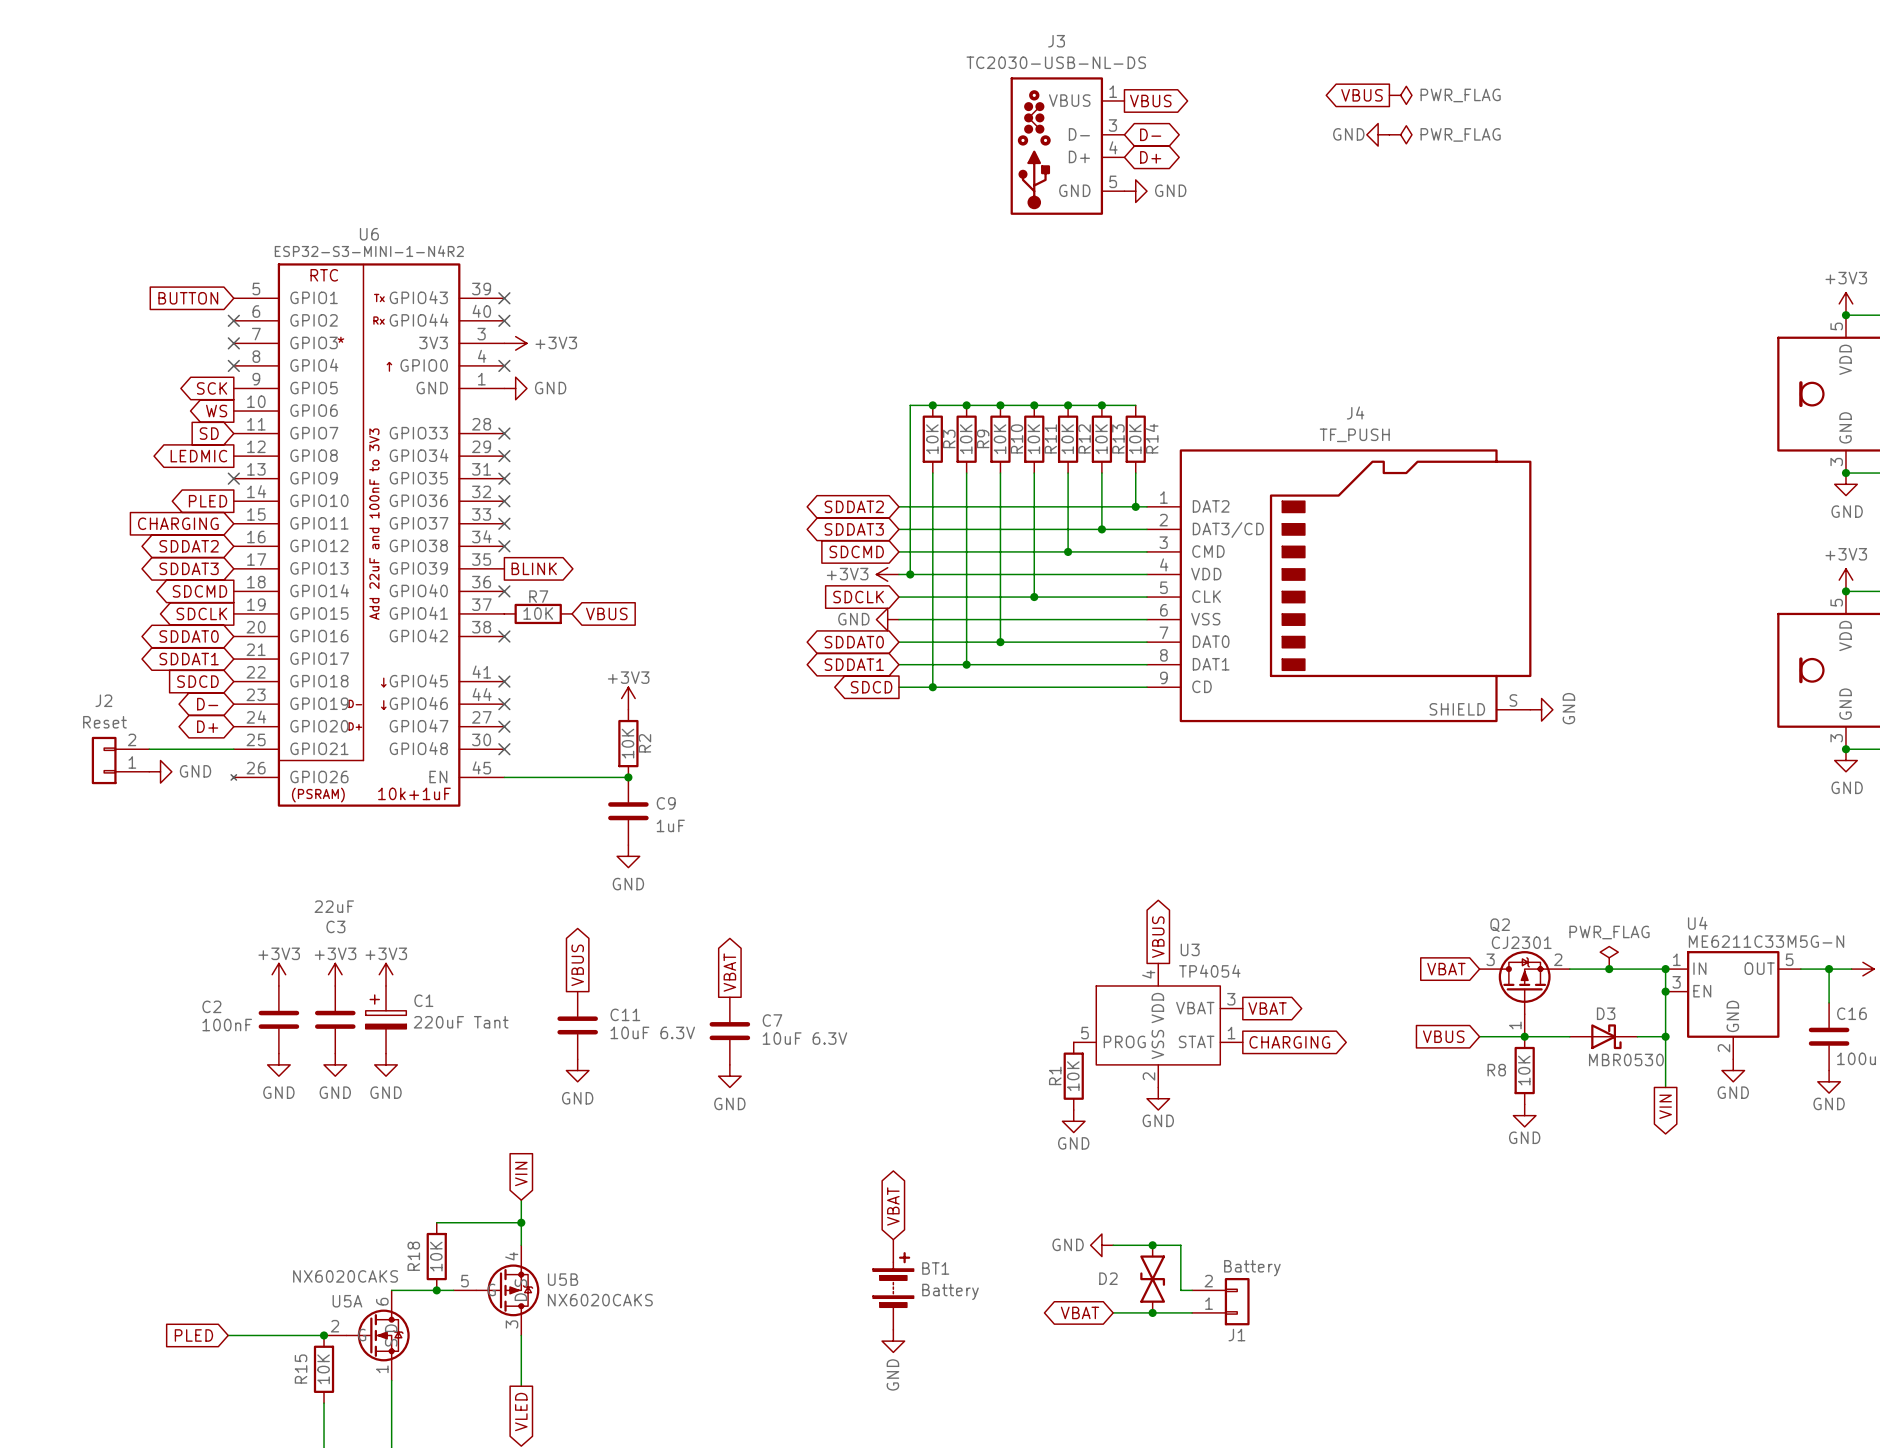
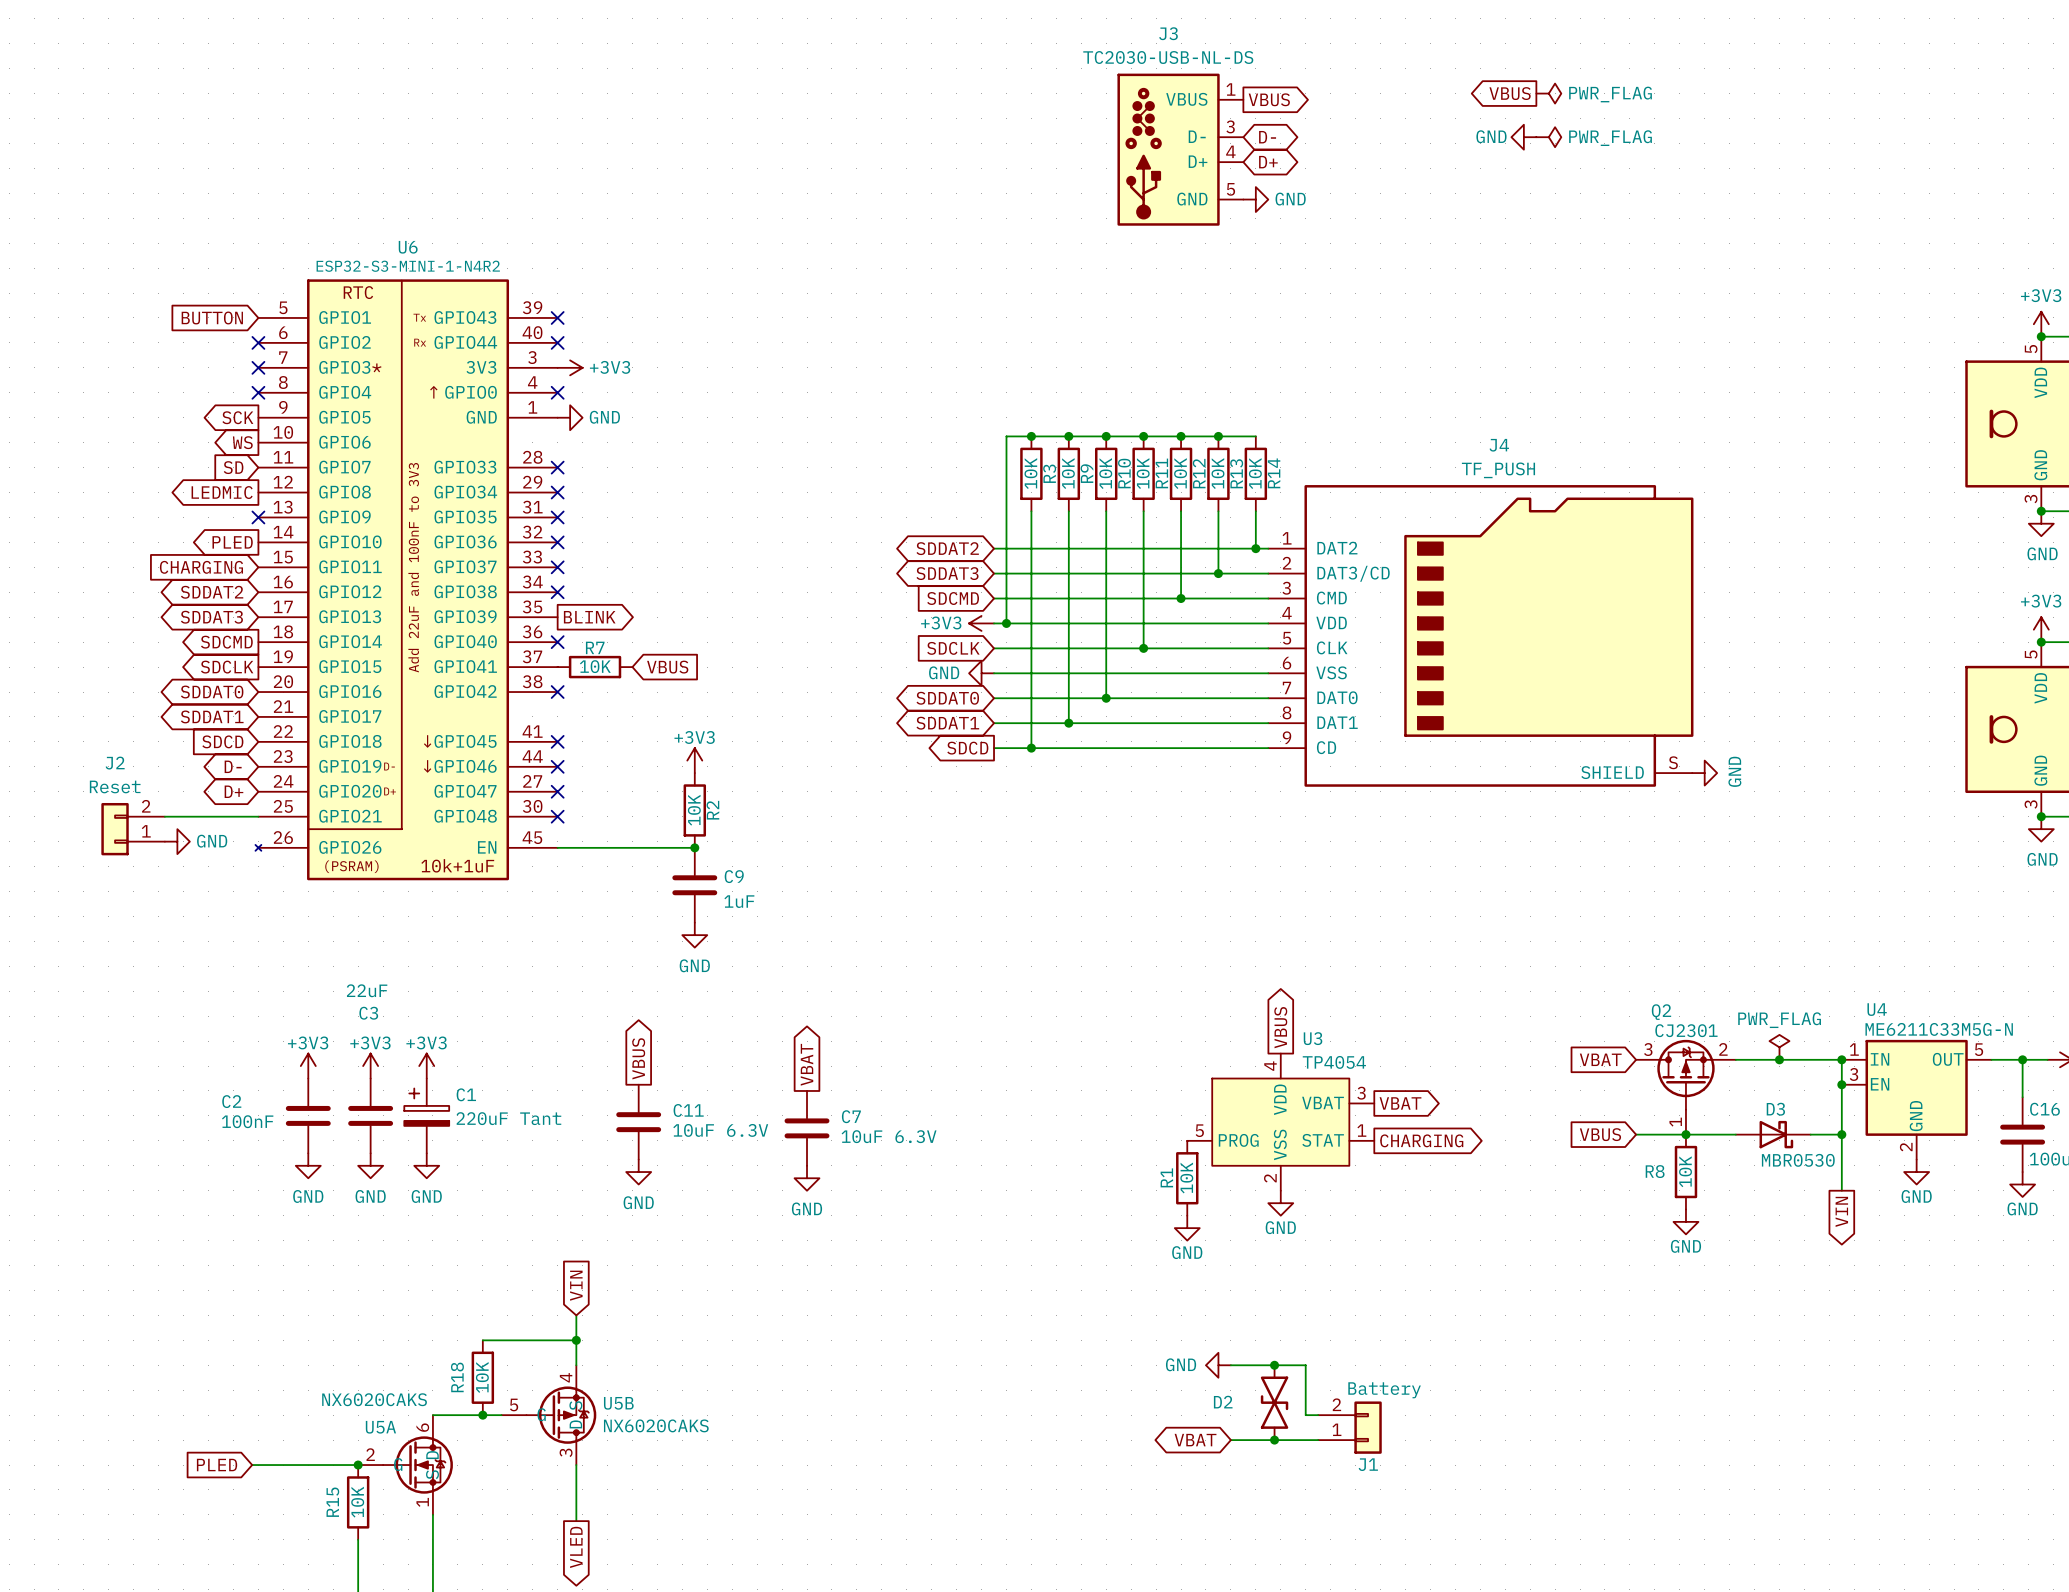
global label: VBAT (893, 1206) -> none
BT1: Battery (893, 1284) -> none
power symbol: GND (893, 1341) -> none

